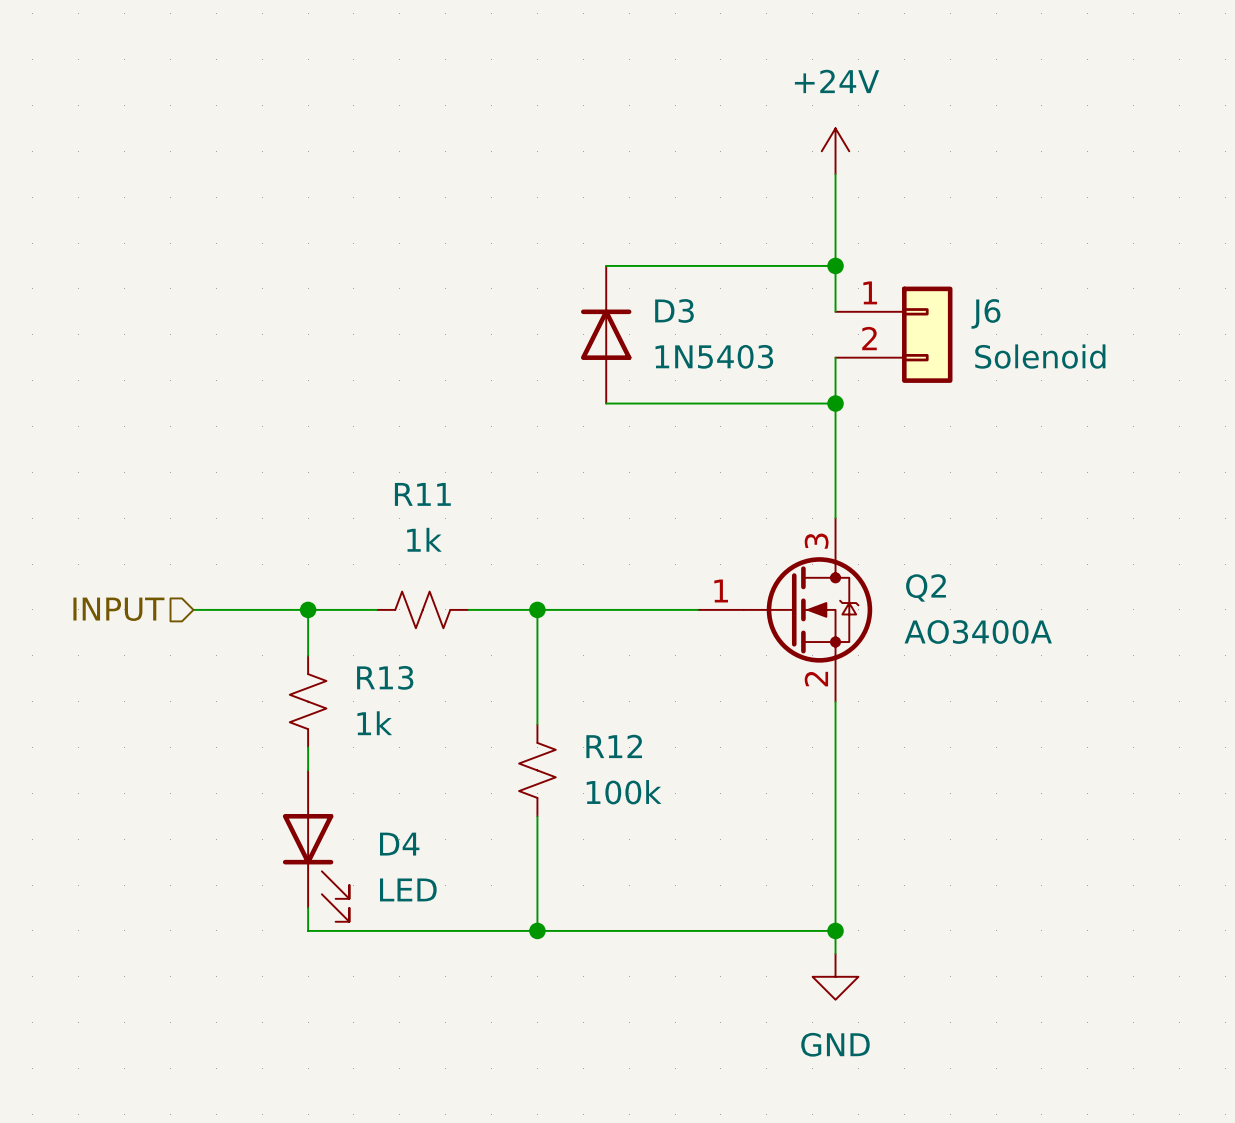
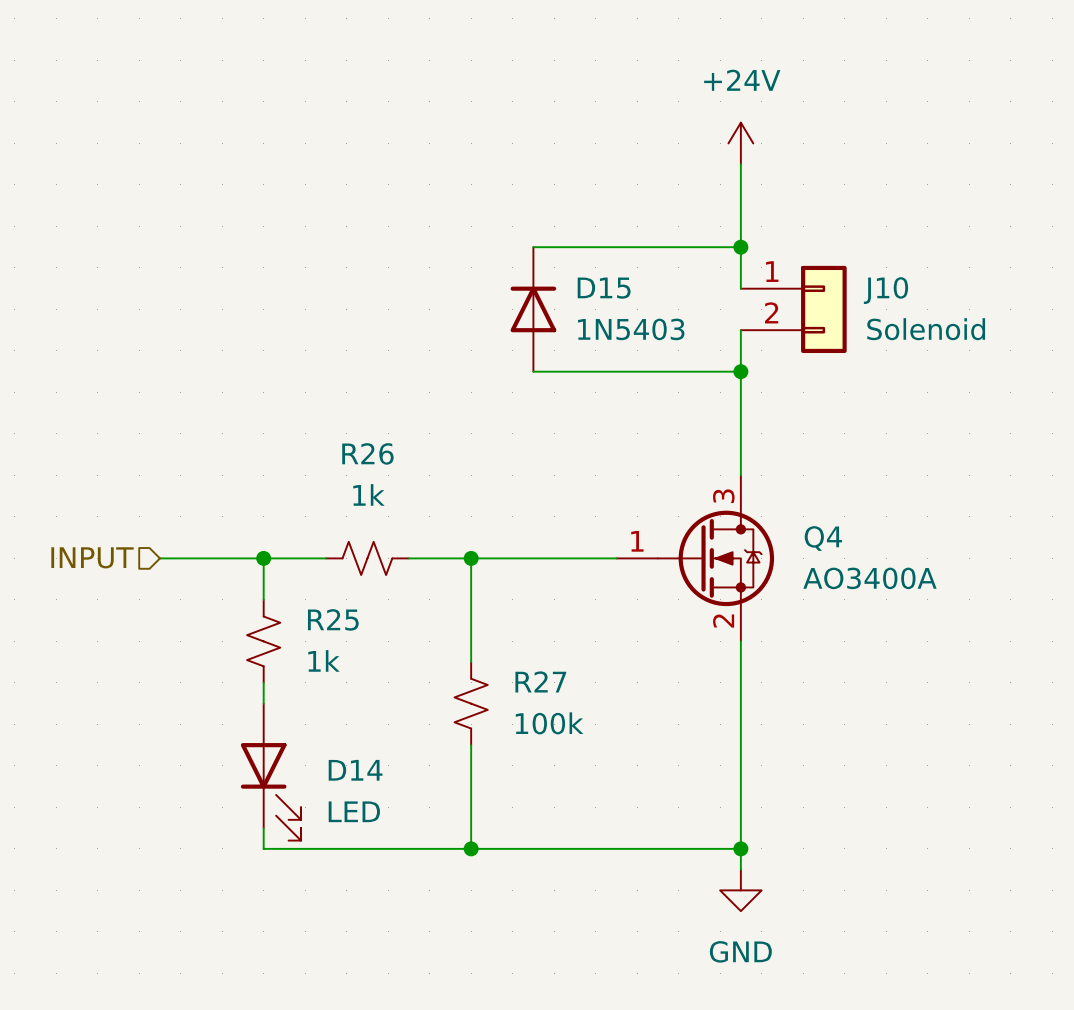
D3 name: D3 (674, 310) -> D15 (604, 288)
J6 name: J6 (985, 313) -> J10 (885, 290)
R11 name: R11 (422, 494) -> R26 (367, 453)
Q2 name: Q2 (926, 587) -> Q4 (823, 538)
R13 name: R13 (385, 677) -> R25 (333, 619)
R12 name: R12 (614, 746) -> R27 (540, 681)
D4 name: D4 (399, 844) -> D14 (355, 770)

